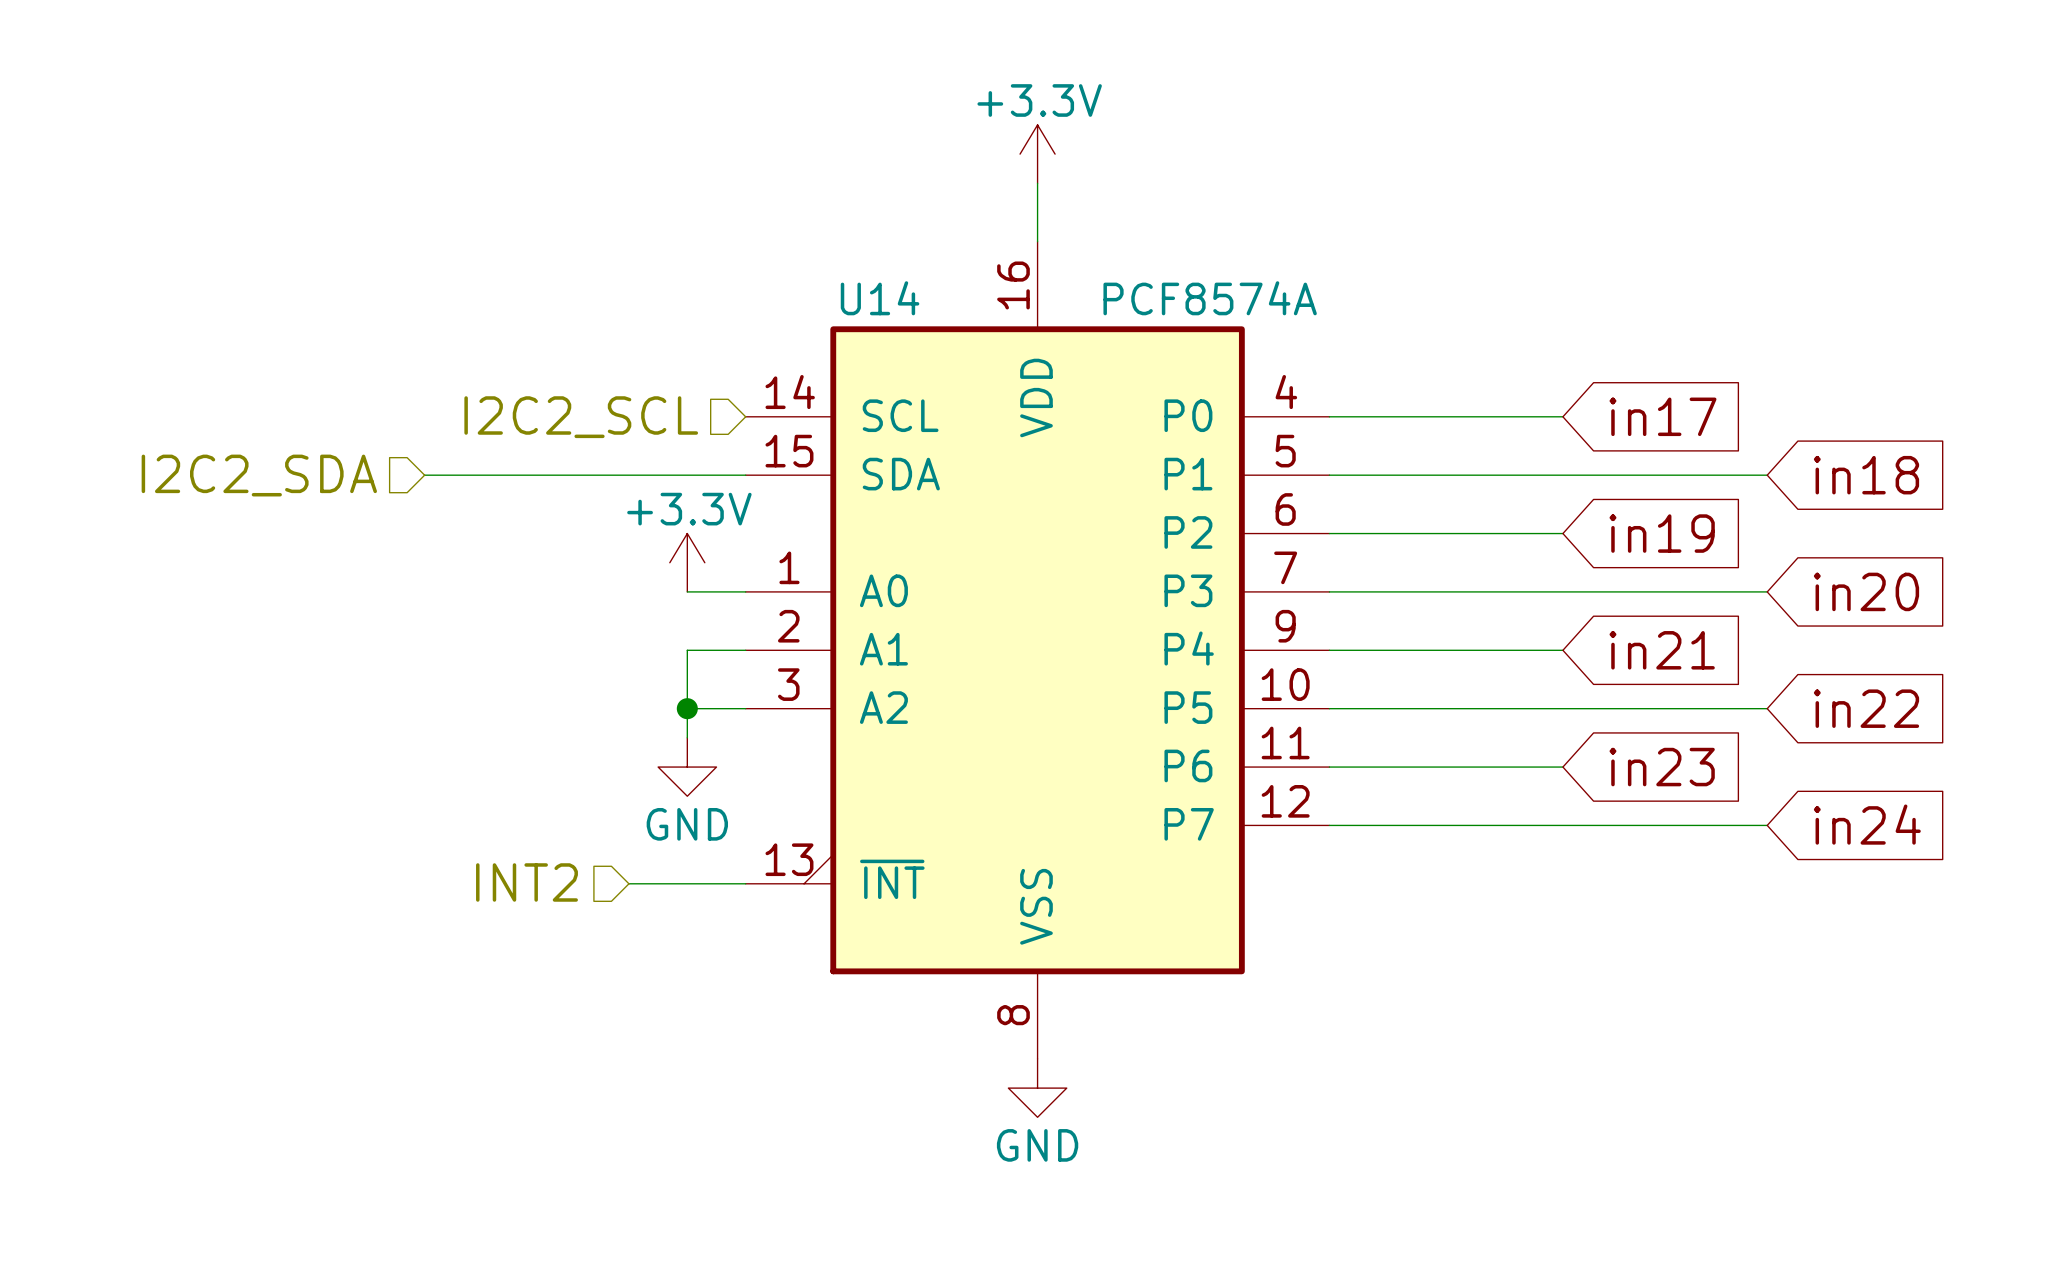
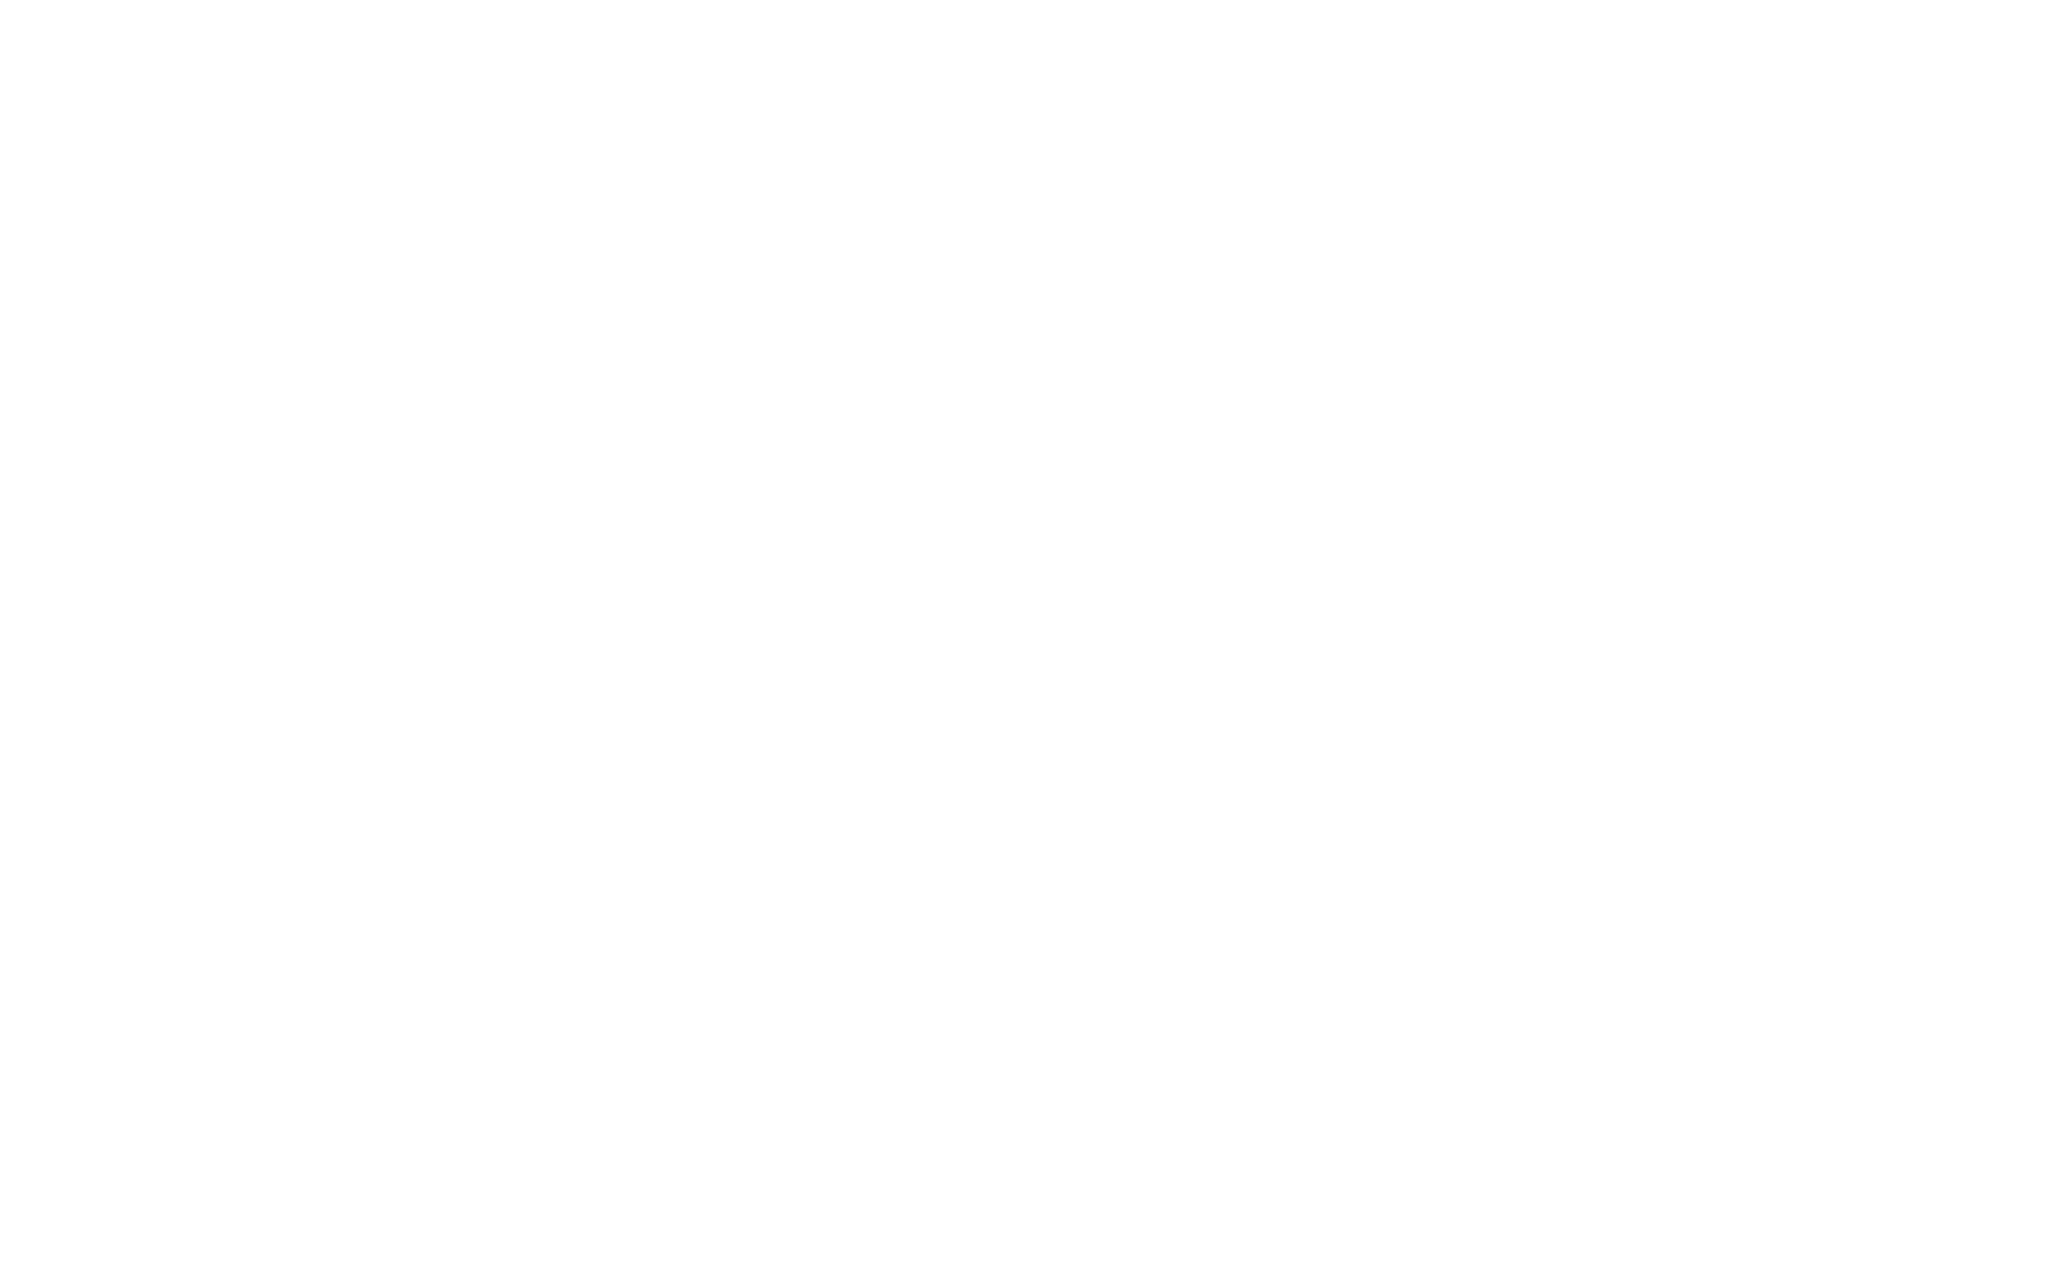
power symbol: +3.3V (1037, 154) -> none
wire: (1037, 183) (1037, 241) -> none
wire: (1329, 416) (1562, 416) -> none
global label: in17 (1663, 416) -> none
hierarchical label: I2C2_SCL (581, 417) -> none
hierarchical label: I2C2_SDA (259, 475) -> none
wire: (424, 475) (745, 475) -> none
wire: (1329, 475) (1767, 475) -> none
global label: in18 (1866, 475) -> none
wire: (1329, 533) (1562, 533) -> none
global label: in19 (1662, 533) -> none
power symbol: +3.3V (687, 562) -> none
wire: (687, 591) (745, 591) -> none
wire: (1329, 591) (1767, 591) -> none
global label: in20 (1866, 591) -> none
wire: (745, 650) (687, 650) (687, 737) -> none
U14: PCF8574A (1037, 650) -> none
wire: (1329, 650) (1562, 650) -> none
global label: in21 (1662, 650) -> none
wire: (687, 708) (745, 708) -> none
junction: (687, 708) -> none
wire: (1329, 708) (1767, 708) -> none
global label: in22 (1866, 708) -> none
power symbol: GND (687, 767) -> none
wire: (1329, 767) (1562, 767) -> none
global label: in23 (1662, 767) -> none
global label: in24 (1867, 824) -> none
wire: (1329, 825) (1767, 825) -> none
hierarchical label: INT2 (526, 882) -> none
wire: (628, 883) (745, 883) -> none
power symbol: GND (1037, 1088) -> none

